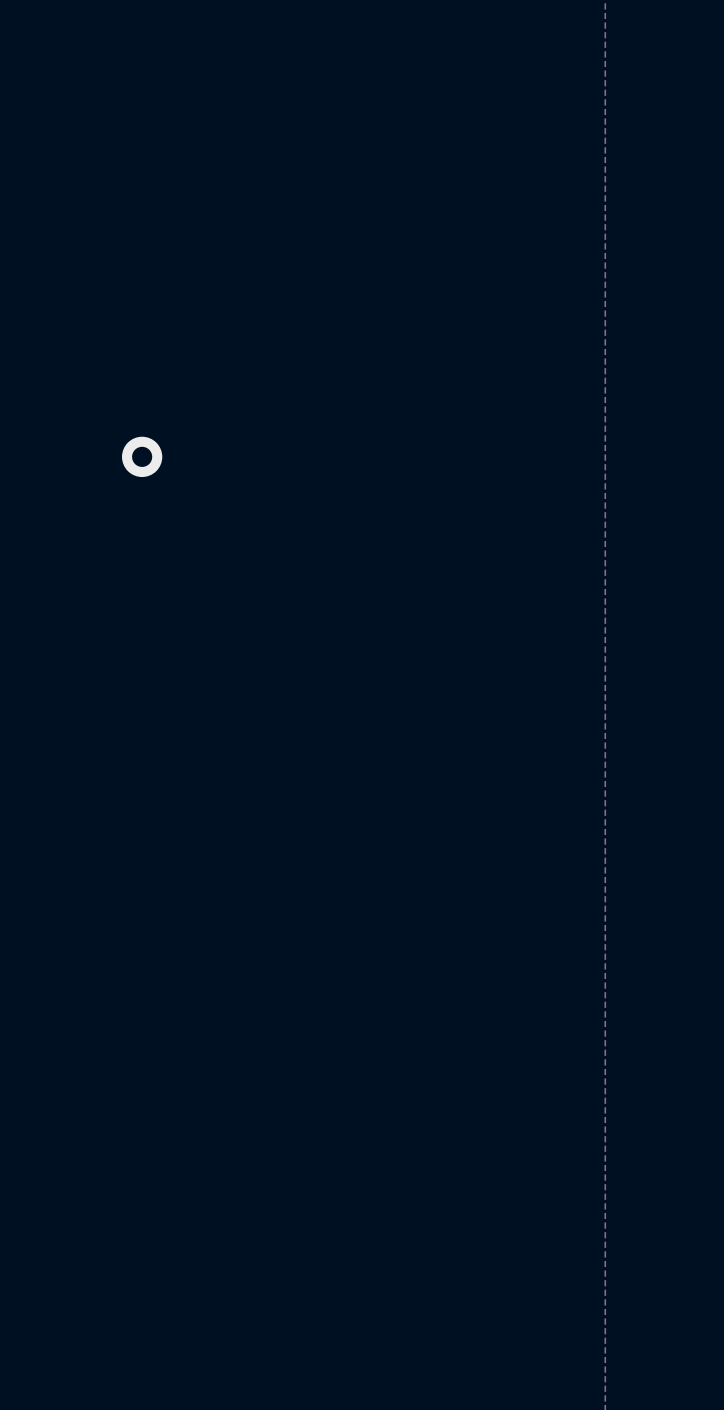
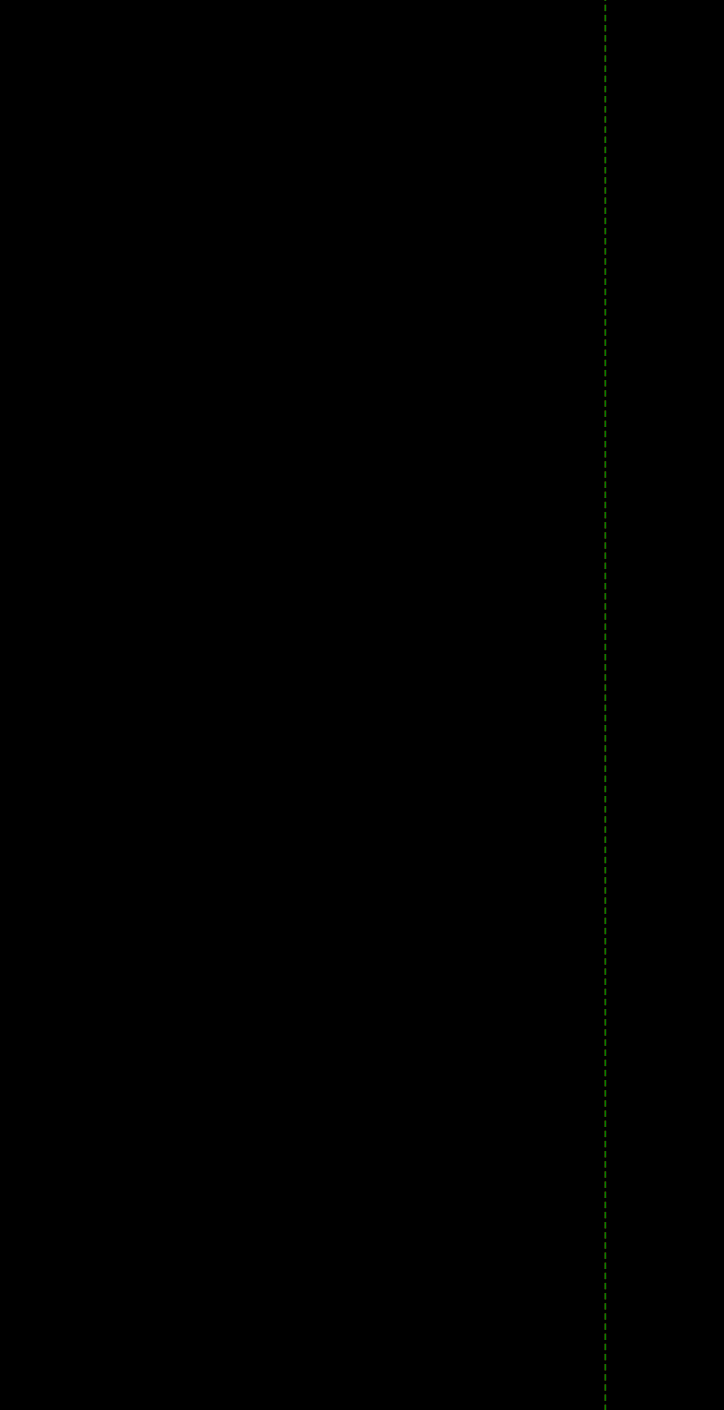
via: (142, 456) -> none

